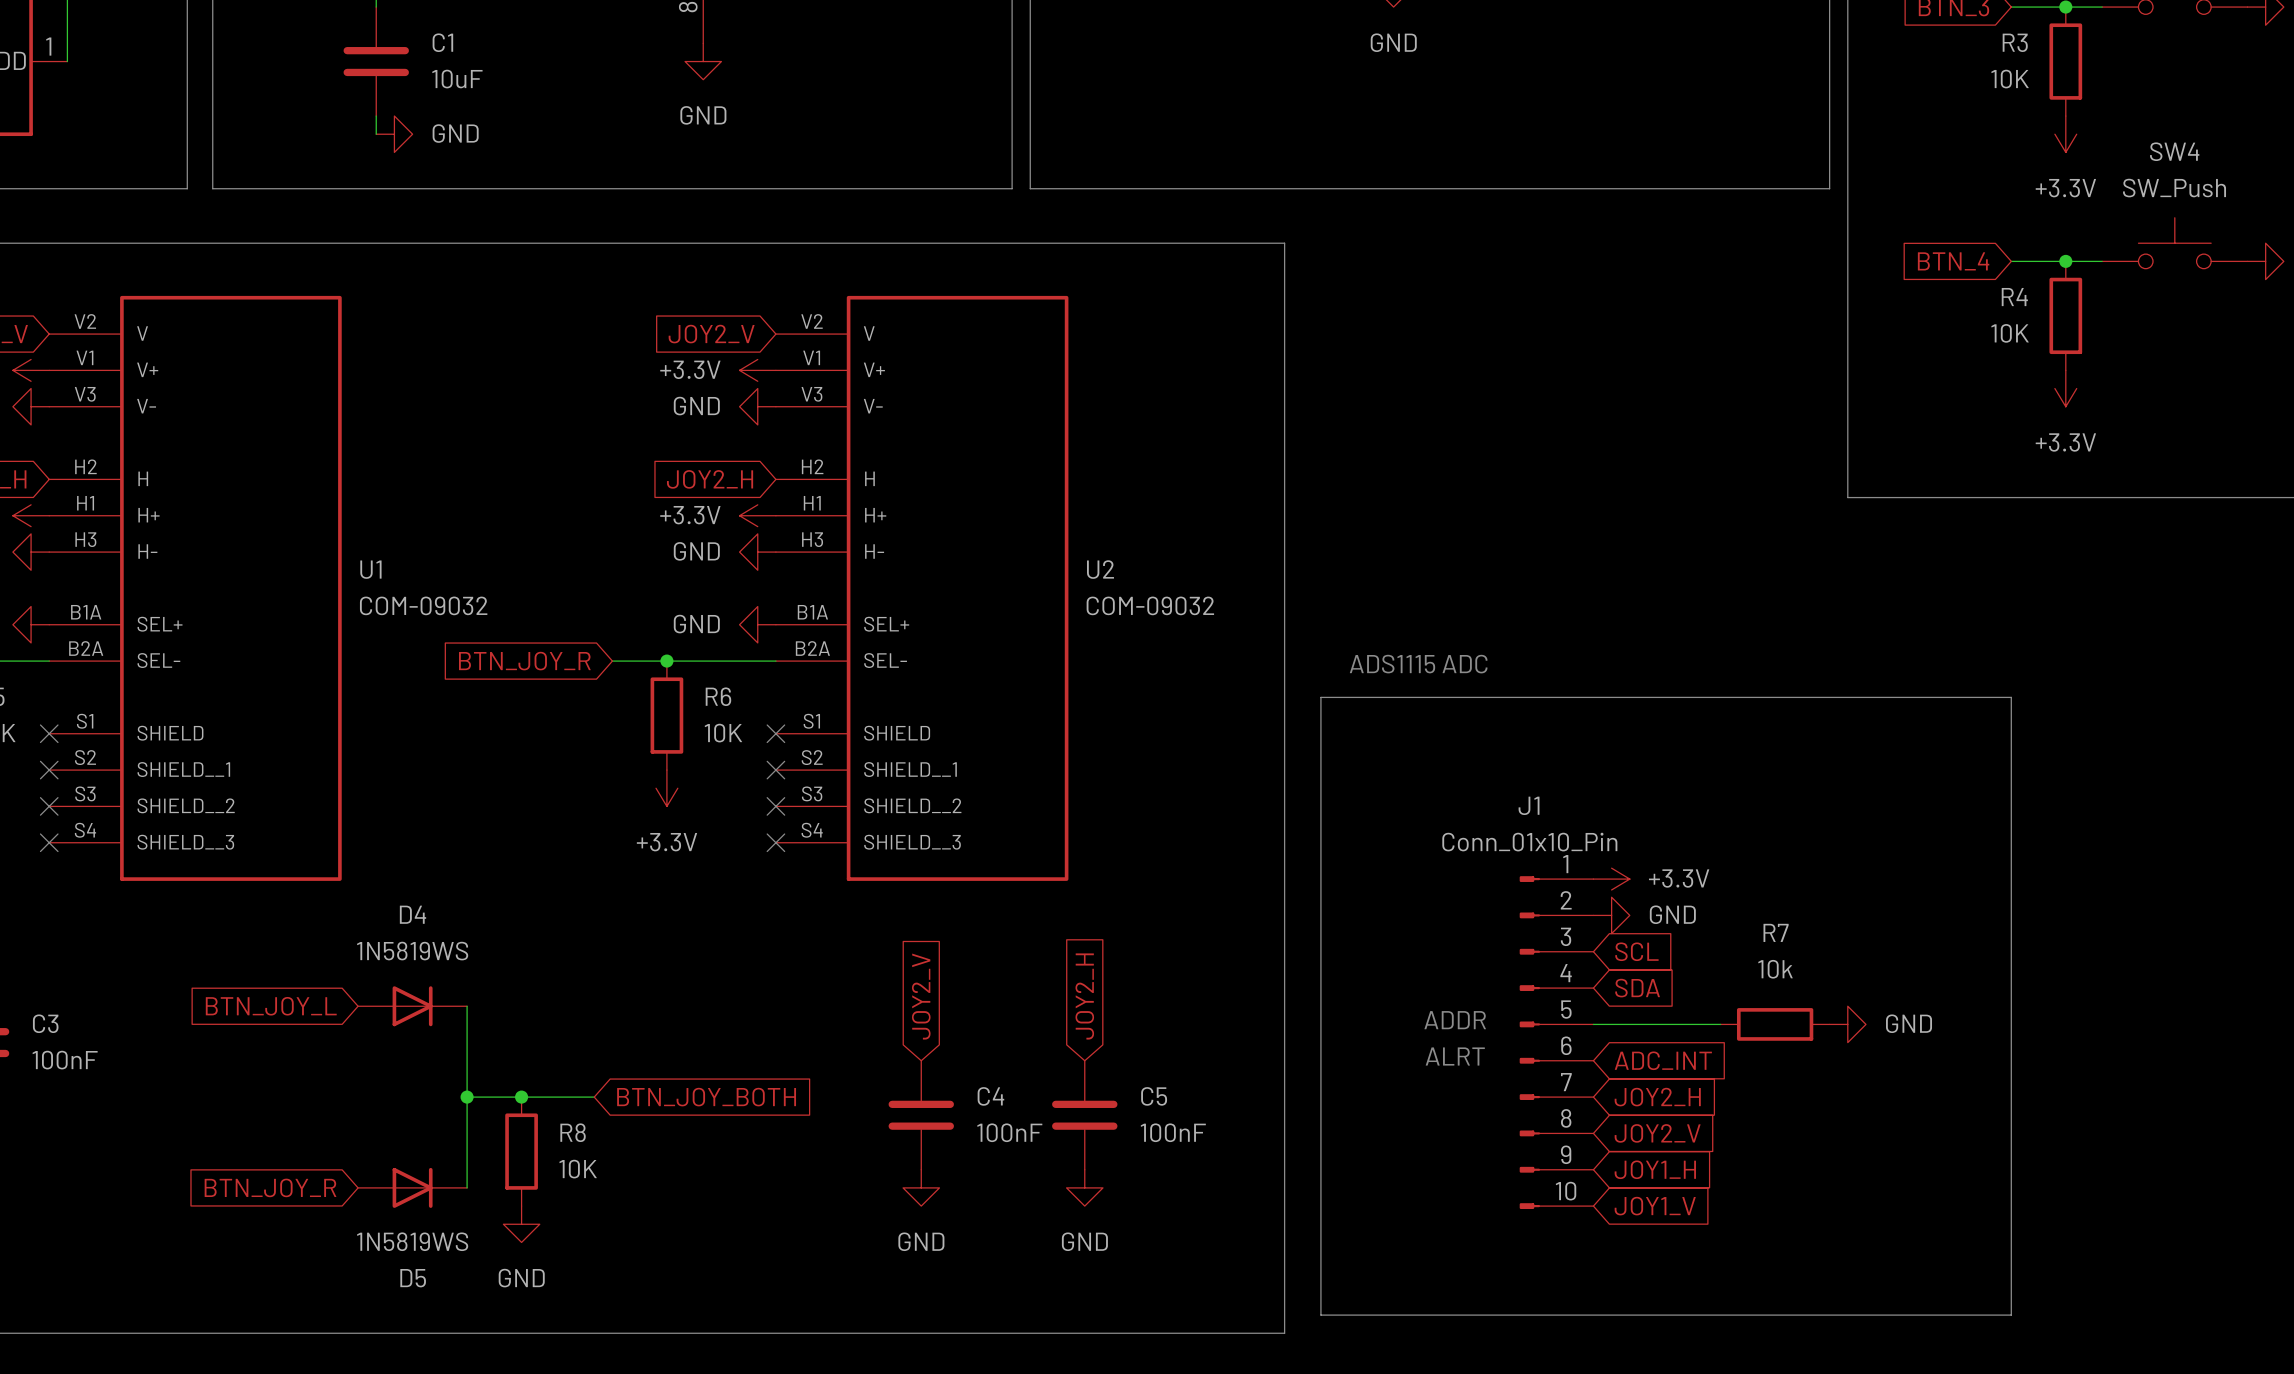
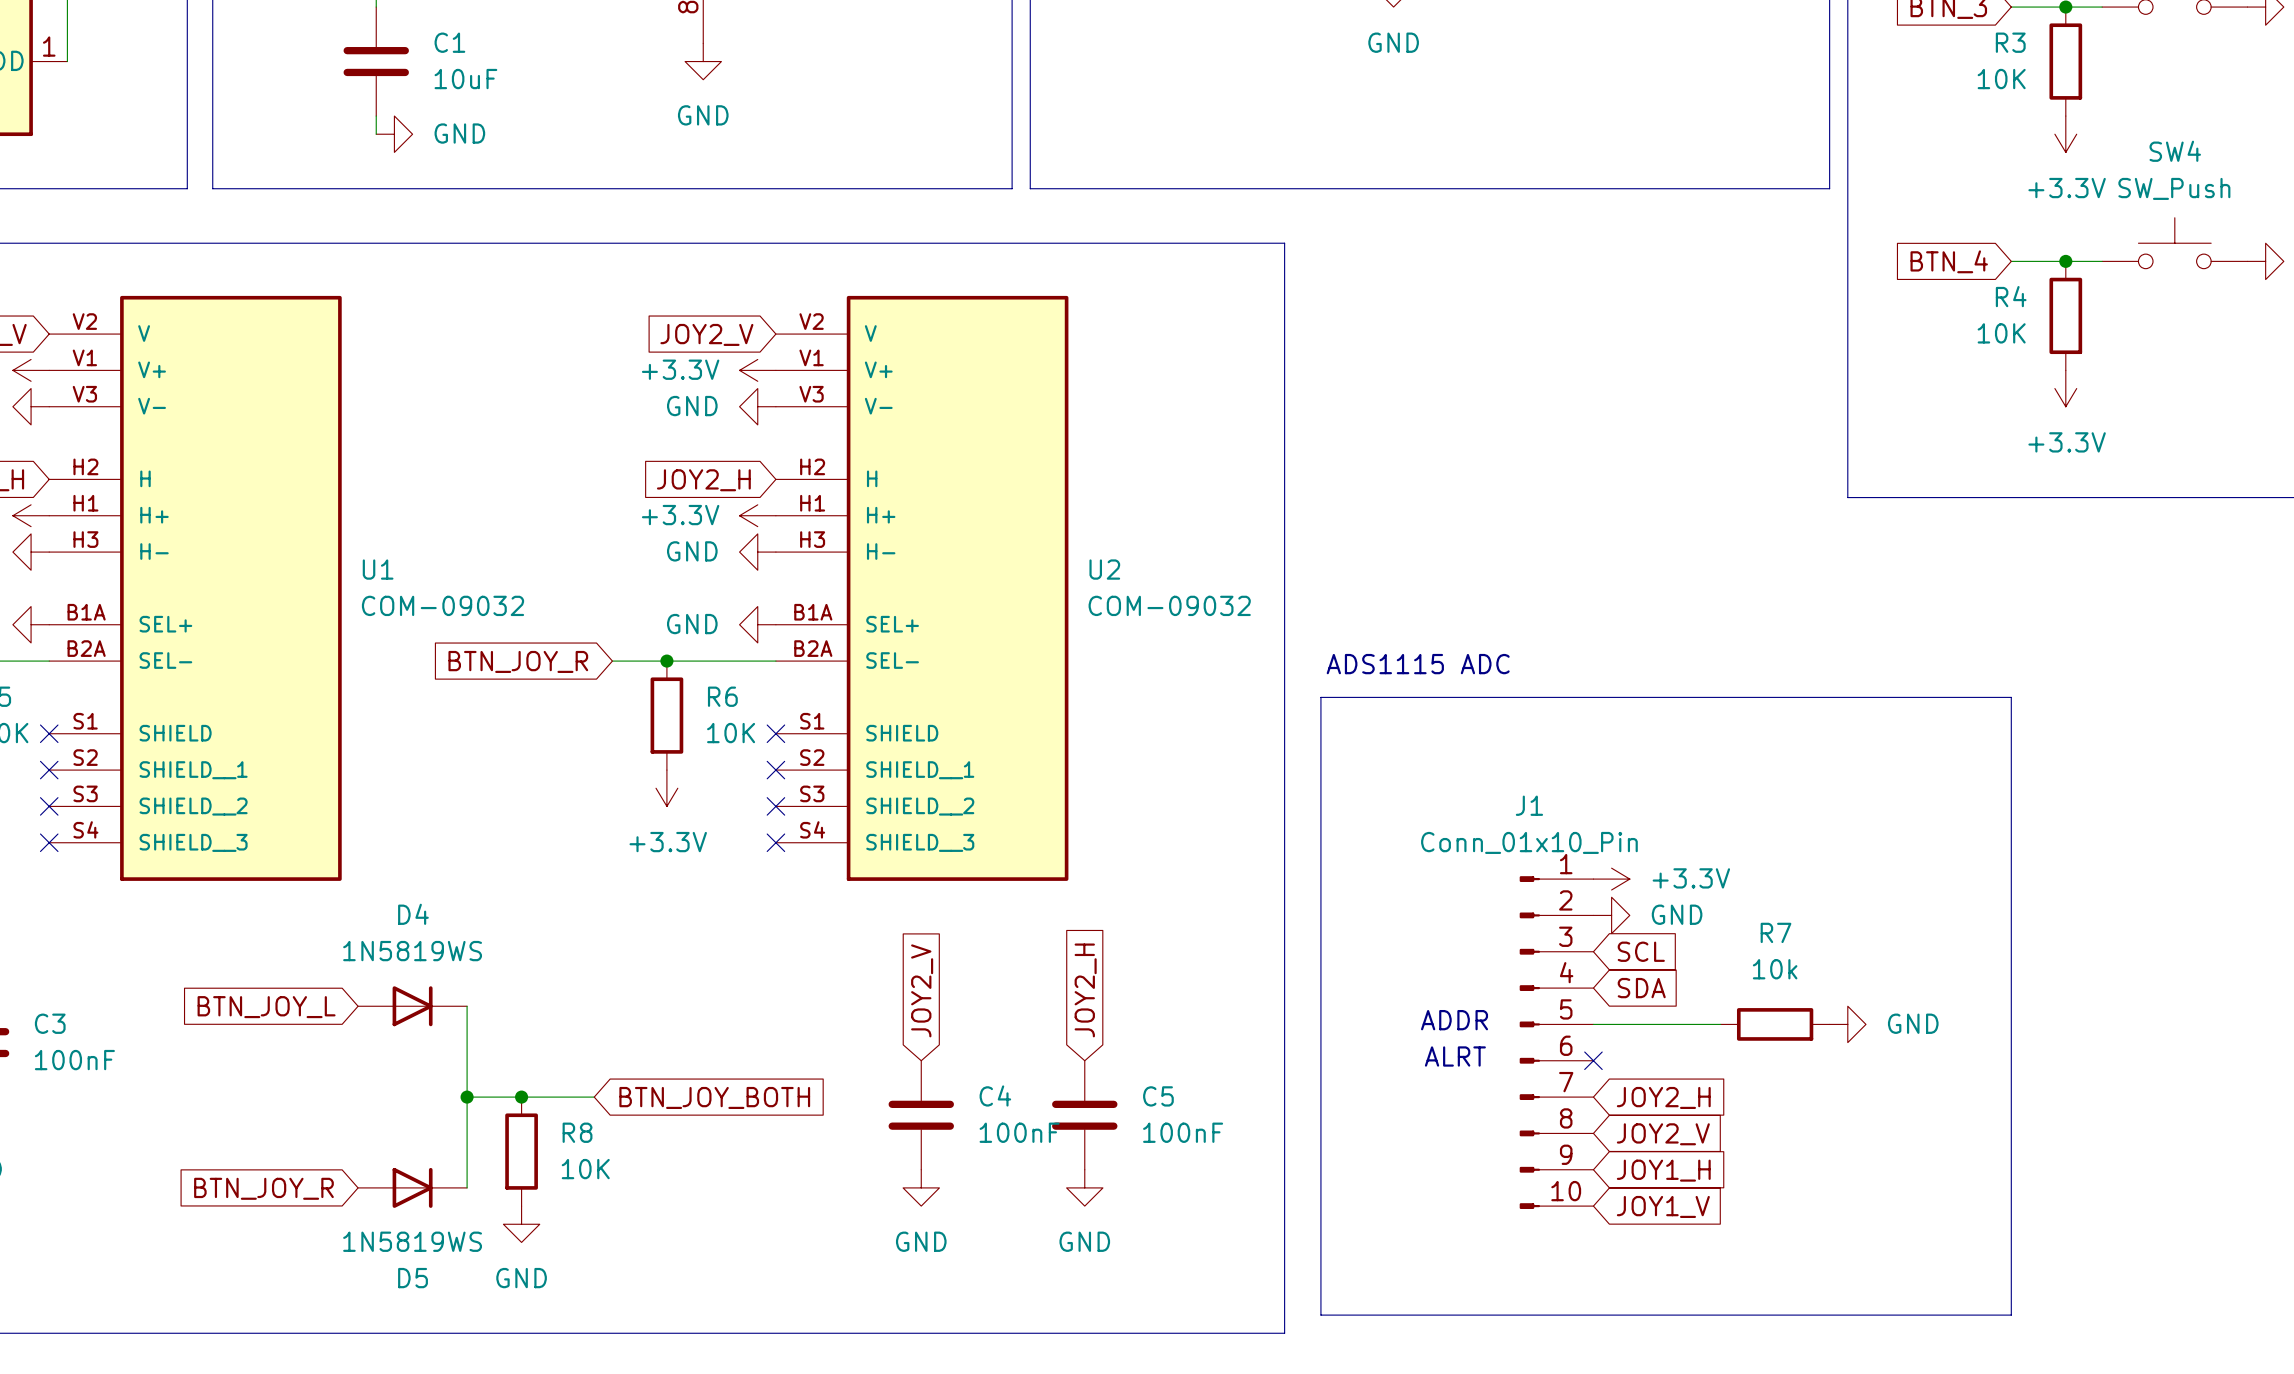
no-connect mark: none -> (1593, 1060)
global label: ADC_INT (1663, 1060) -> none

